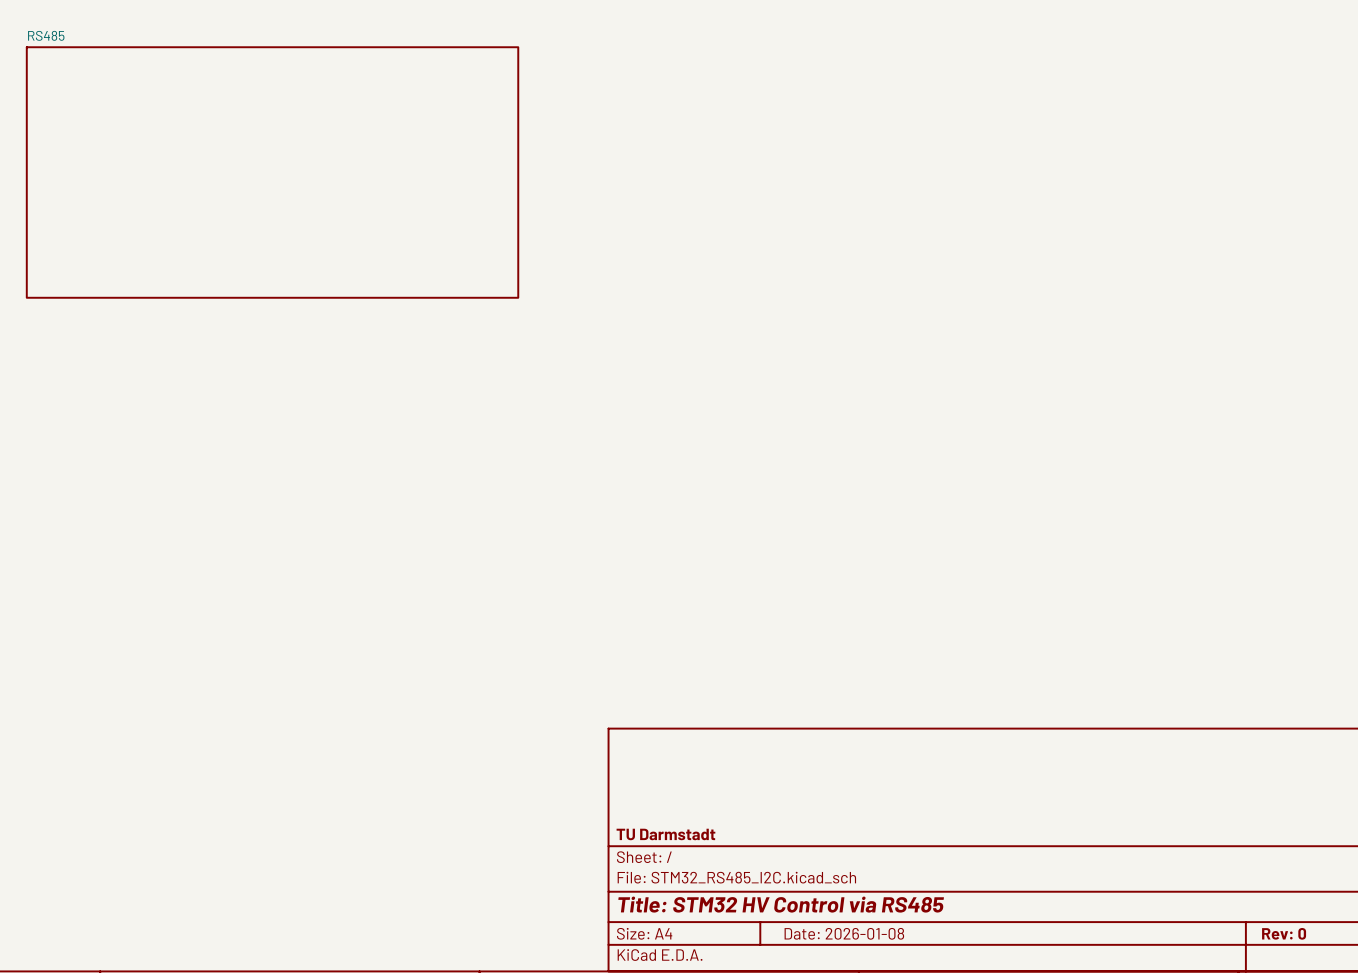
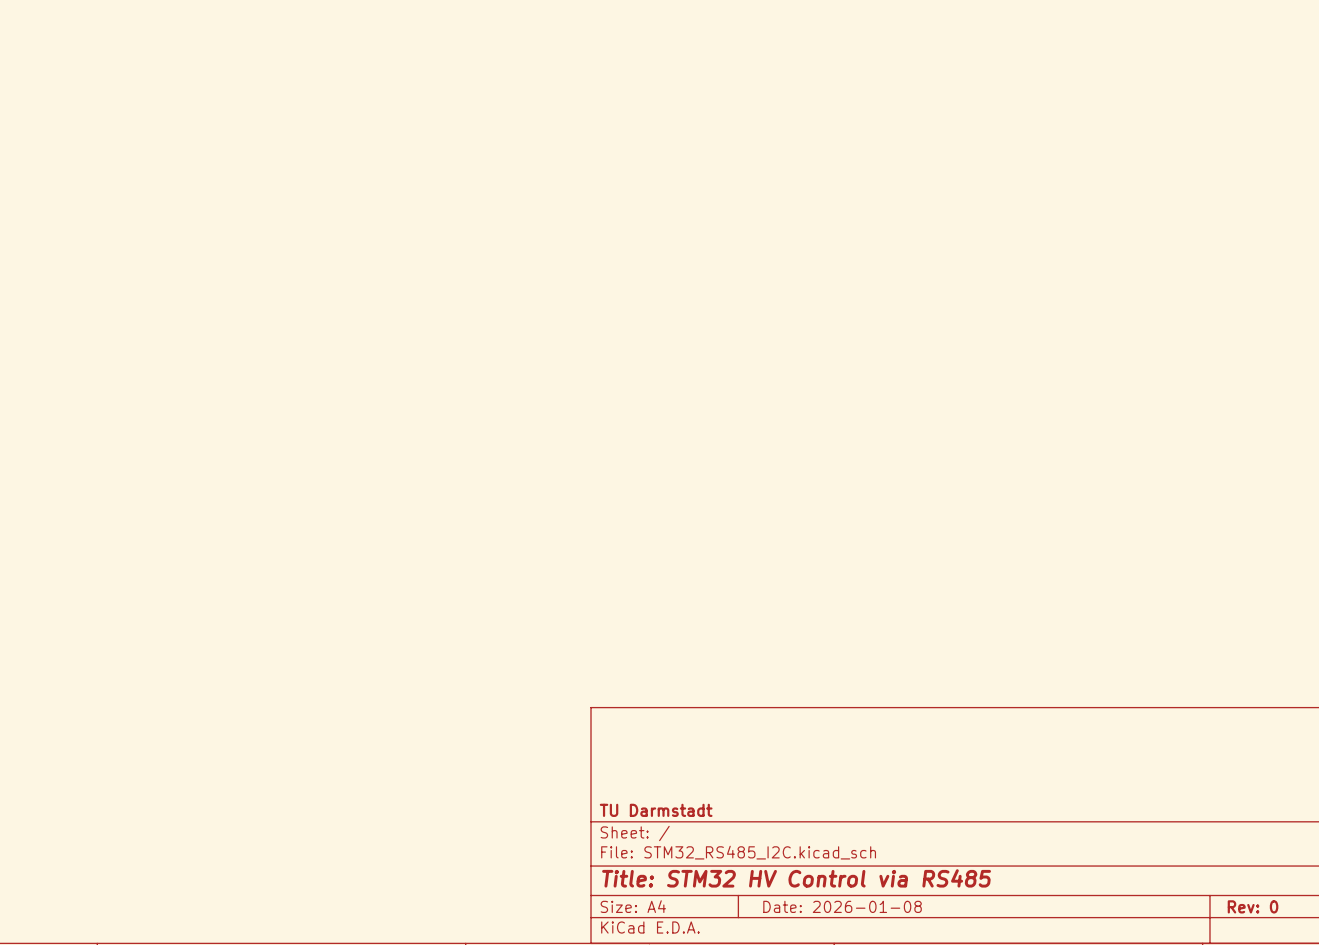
sheet RS485: (272, 172) -> none

